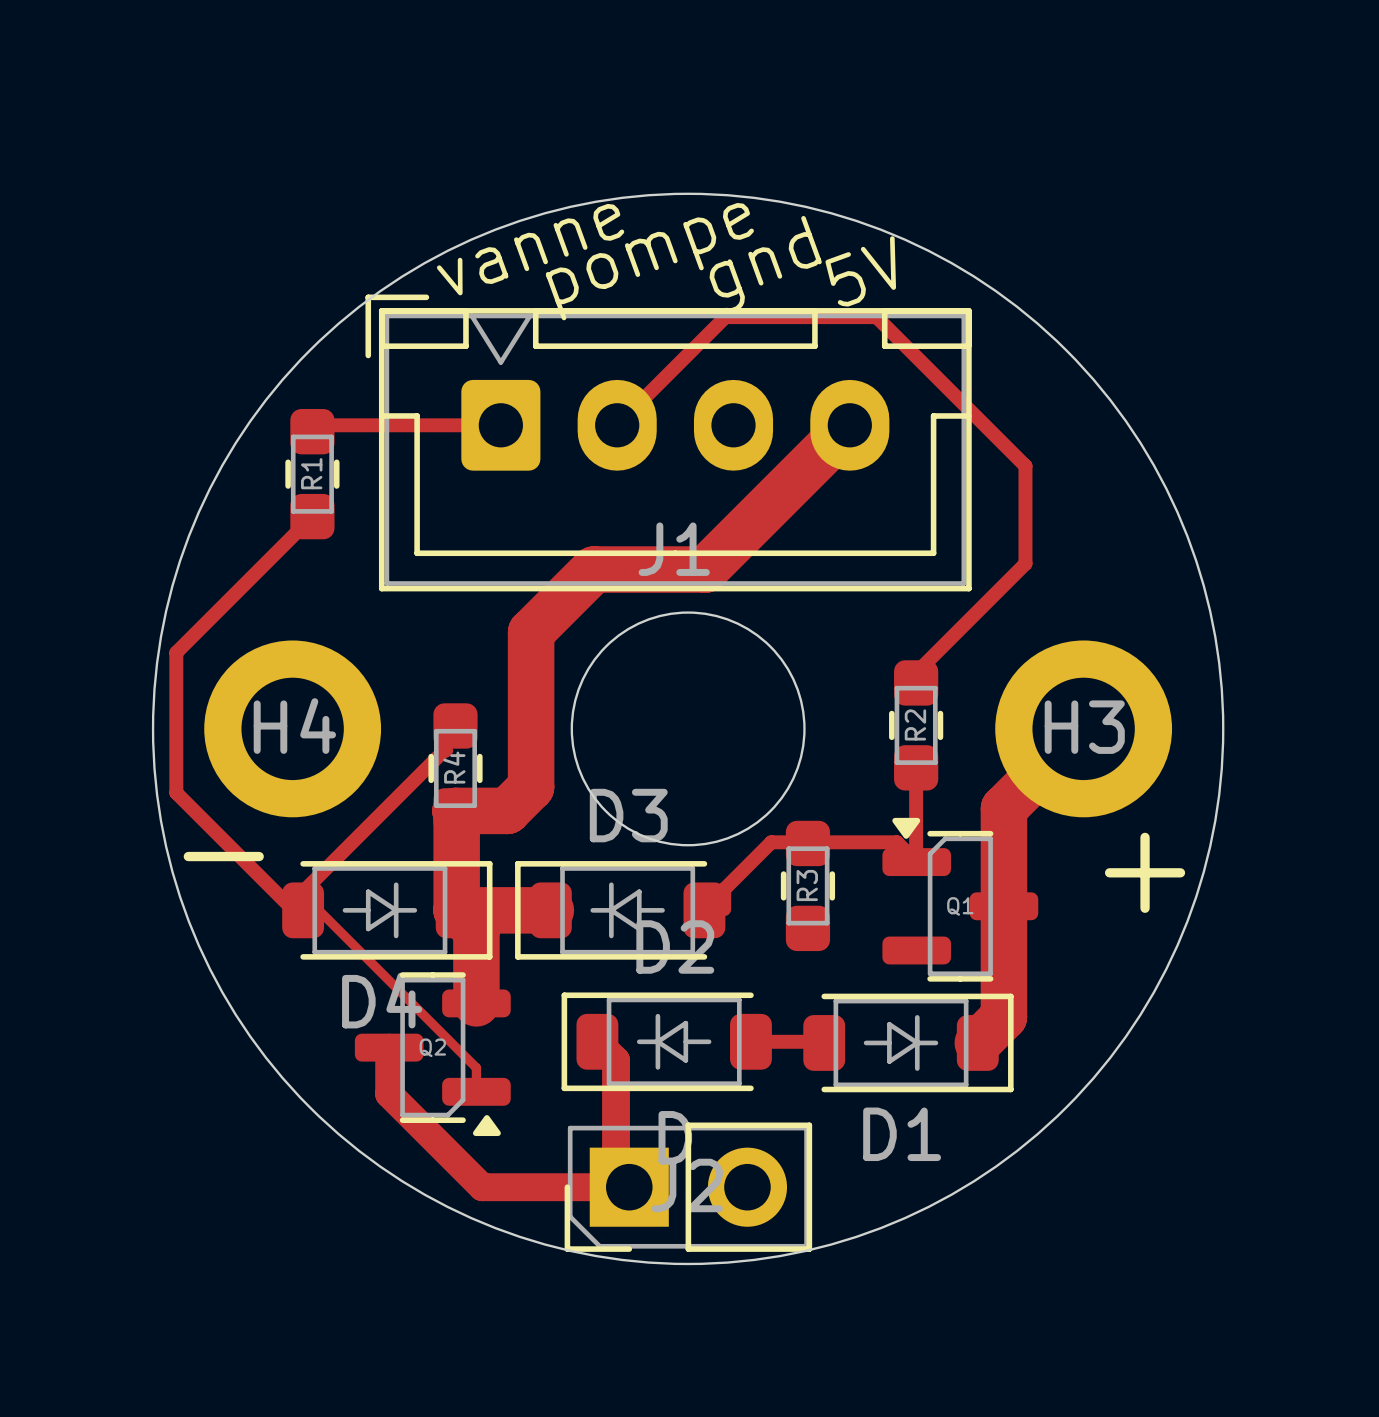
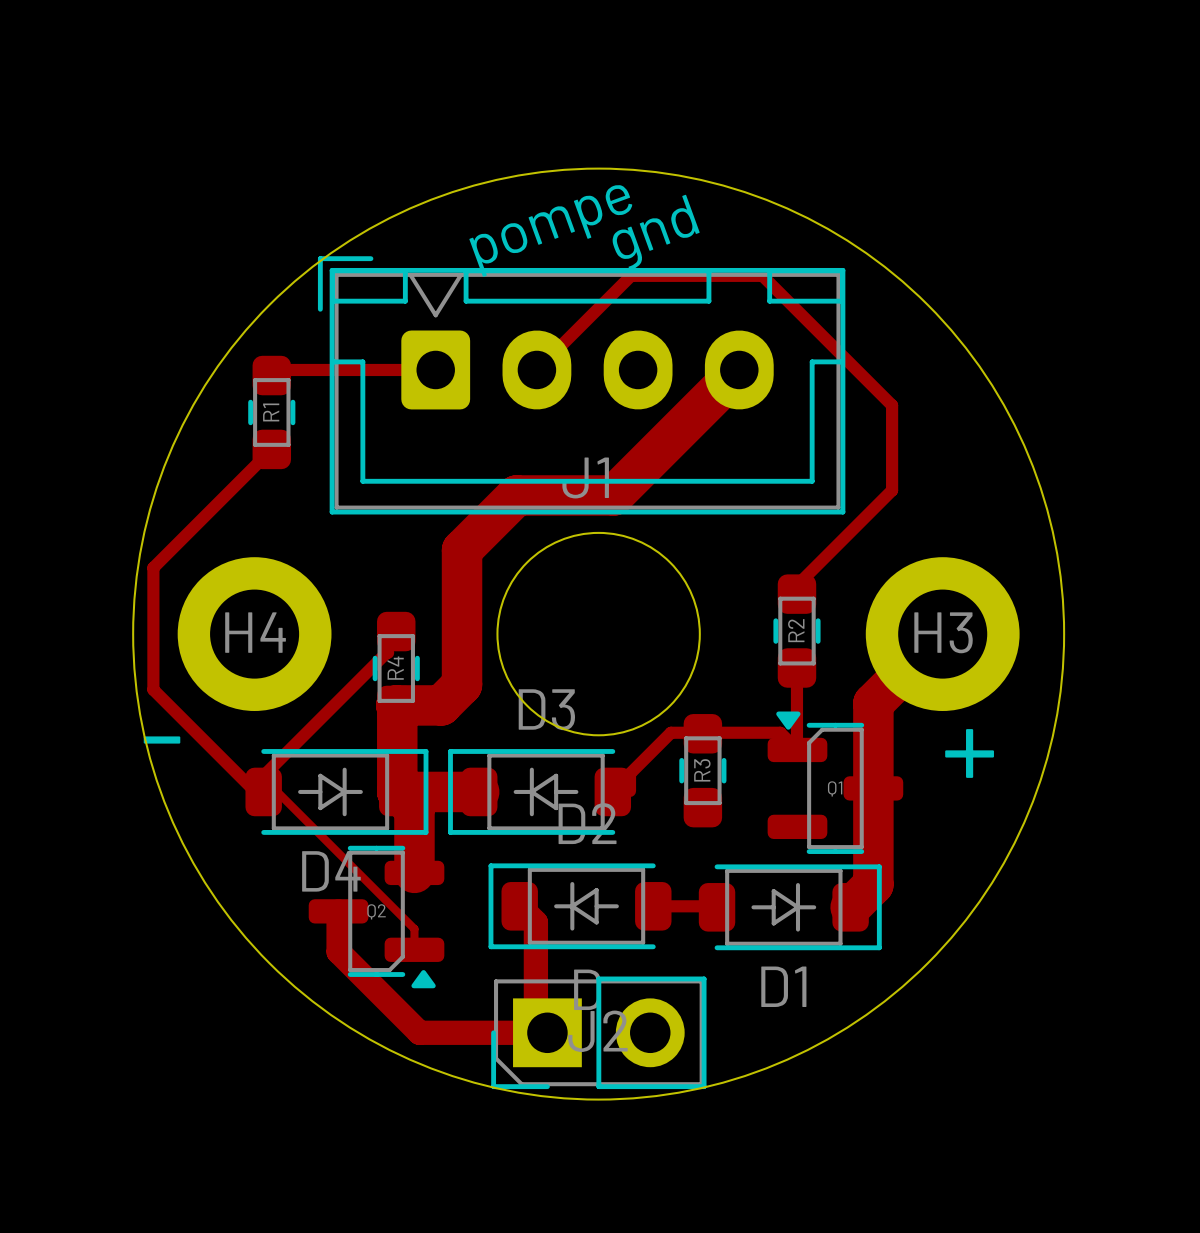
text: vanne (530, 249) -> none
text: 5V (860, 271) -> none

